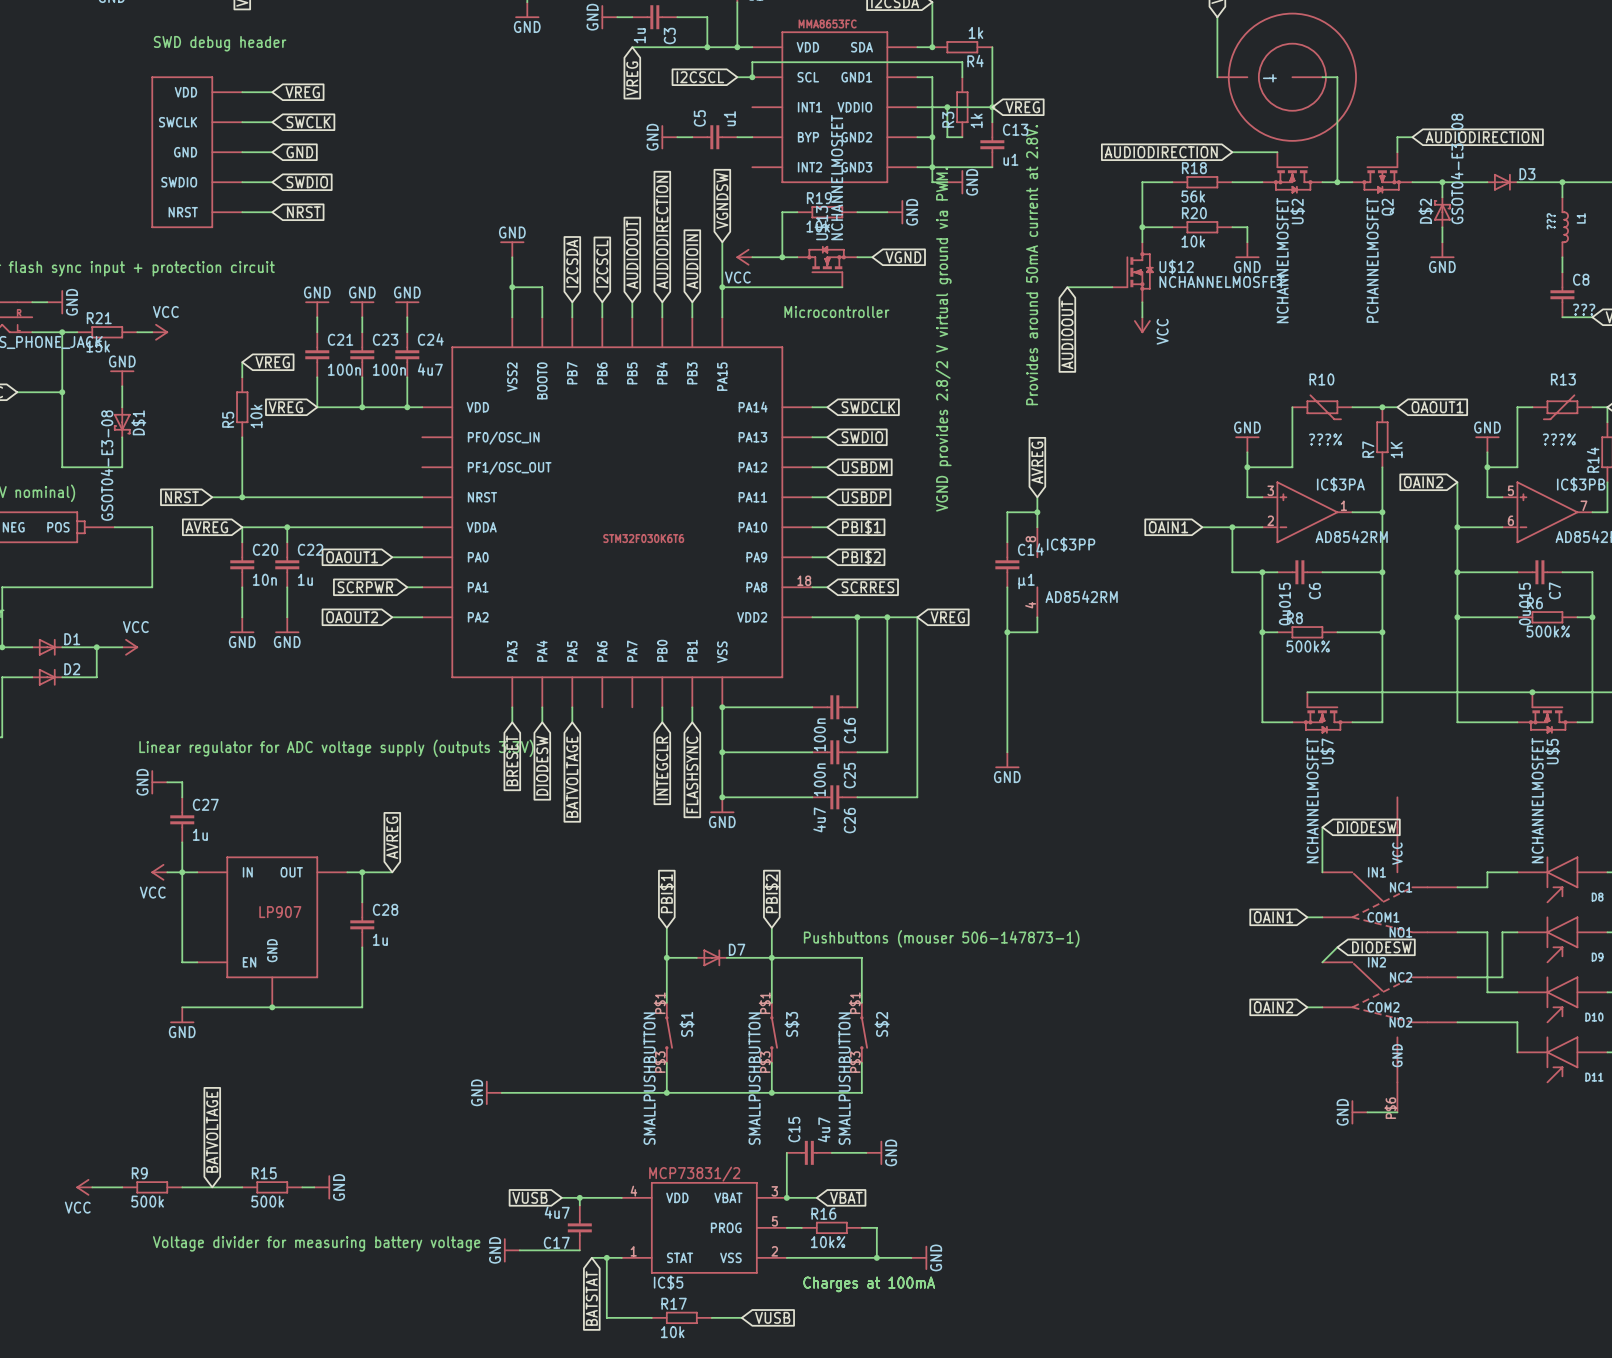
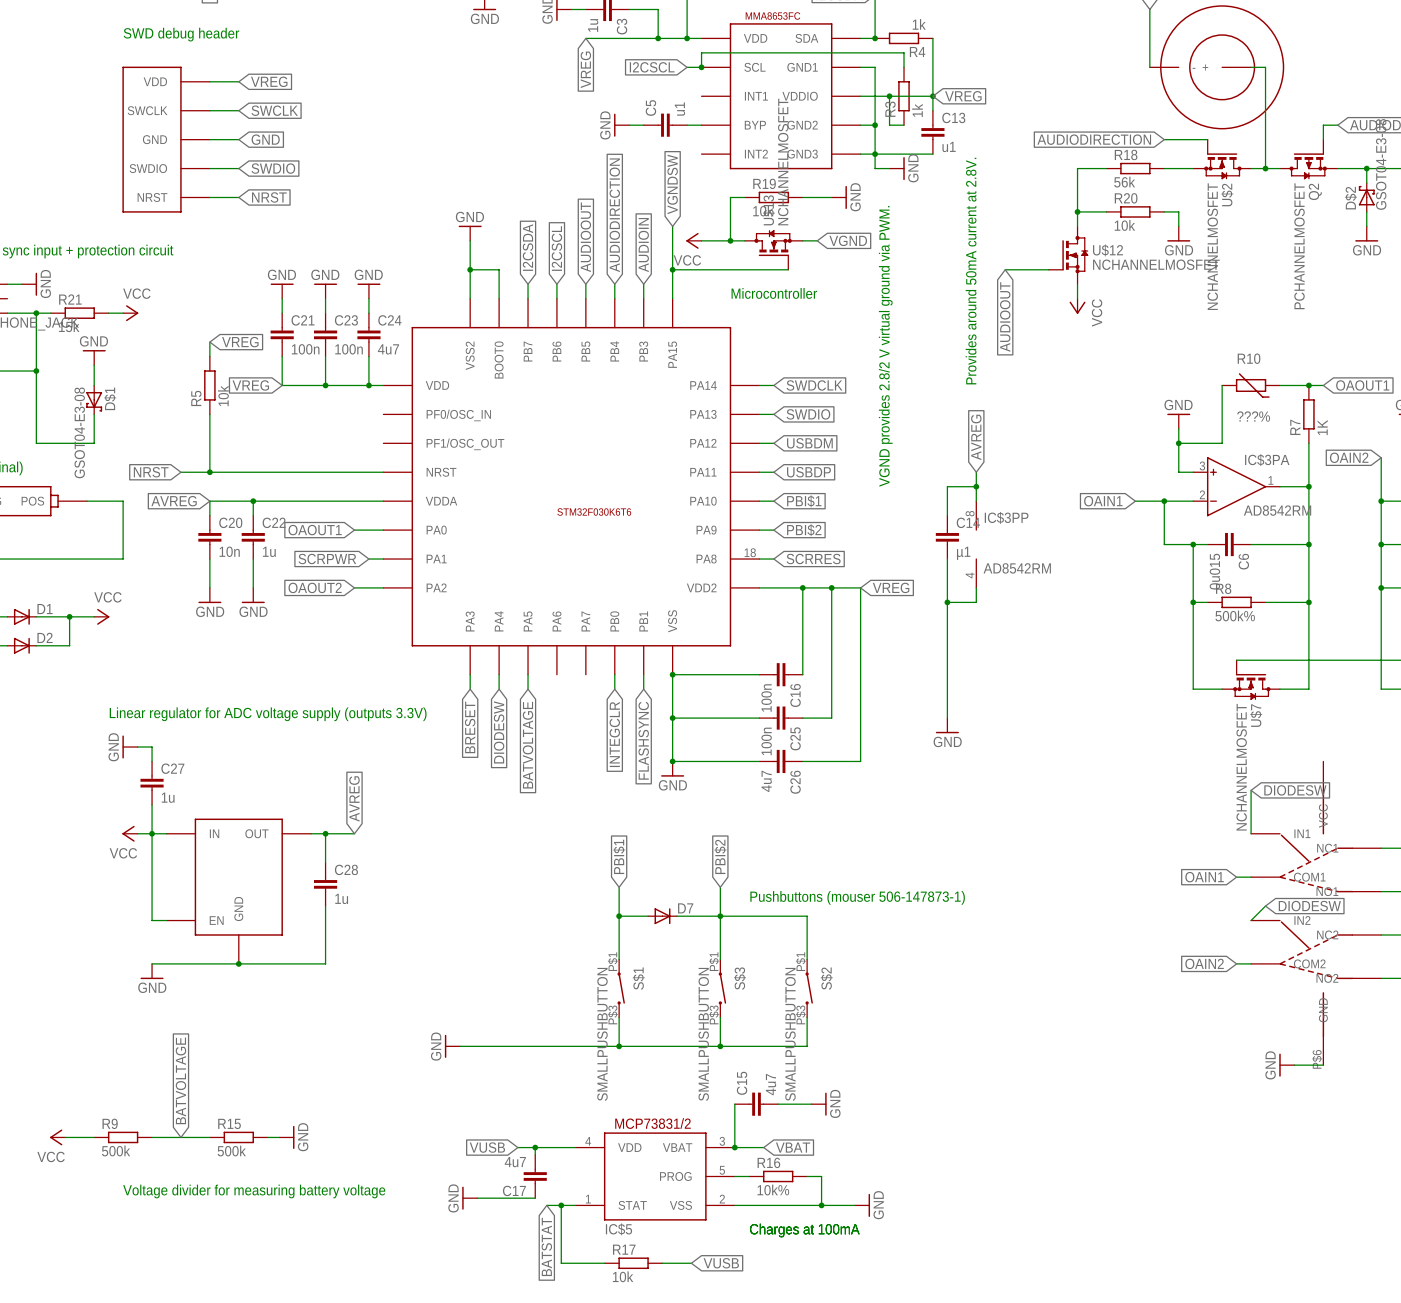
part text: LP907 (280, 912) -> none

